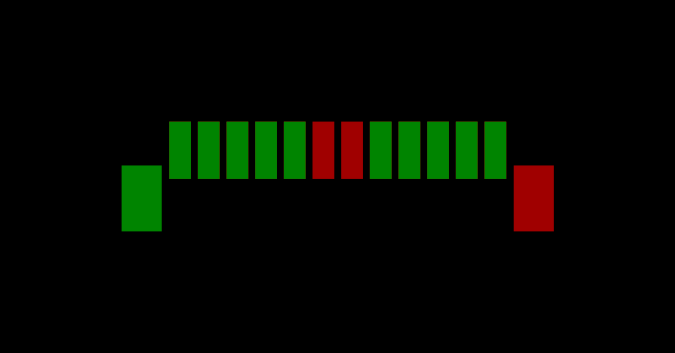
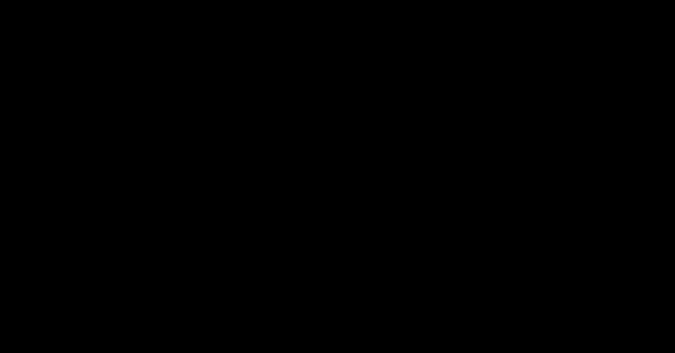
part: (337, 176) -> none

